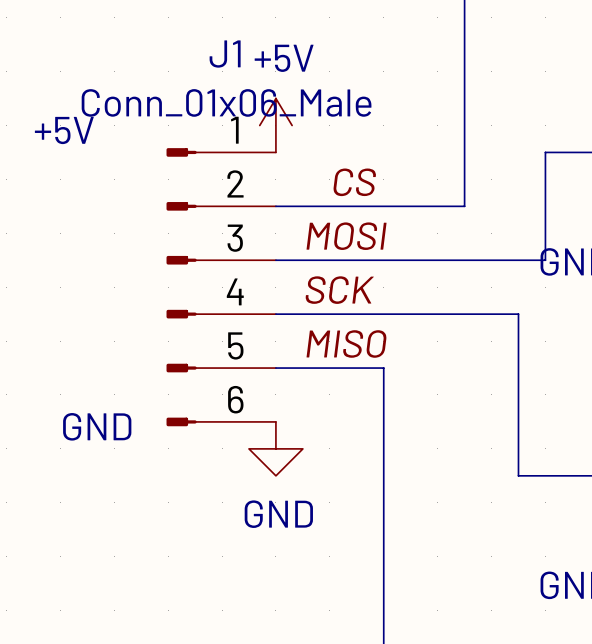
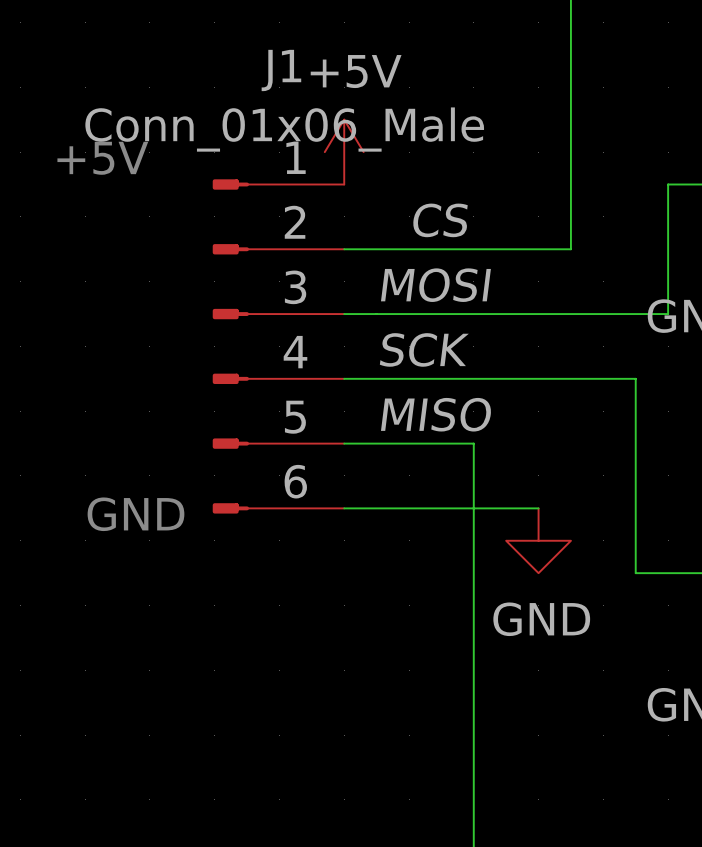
wire: none -> (344, 508) (538, 508)
power symbol position: GND (275, 448) -> GND (538, 540)

